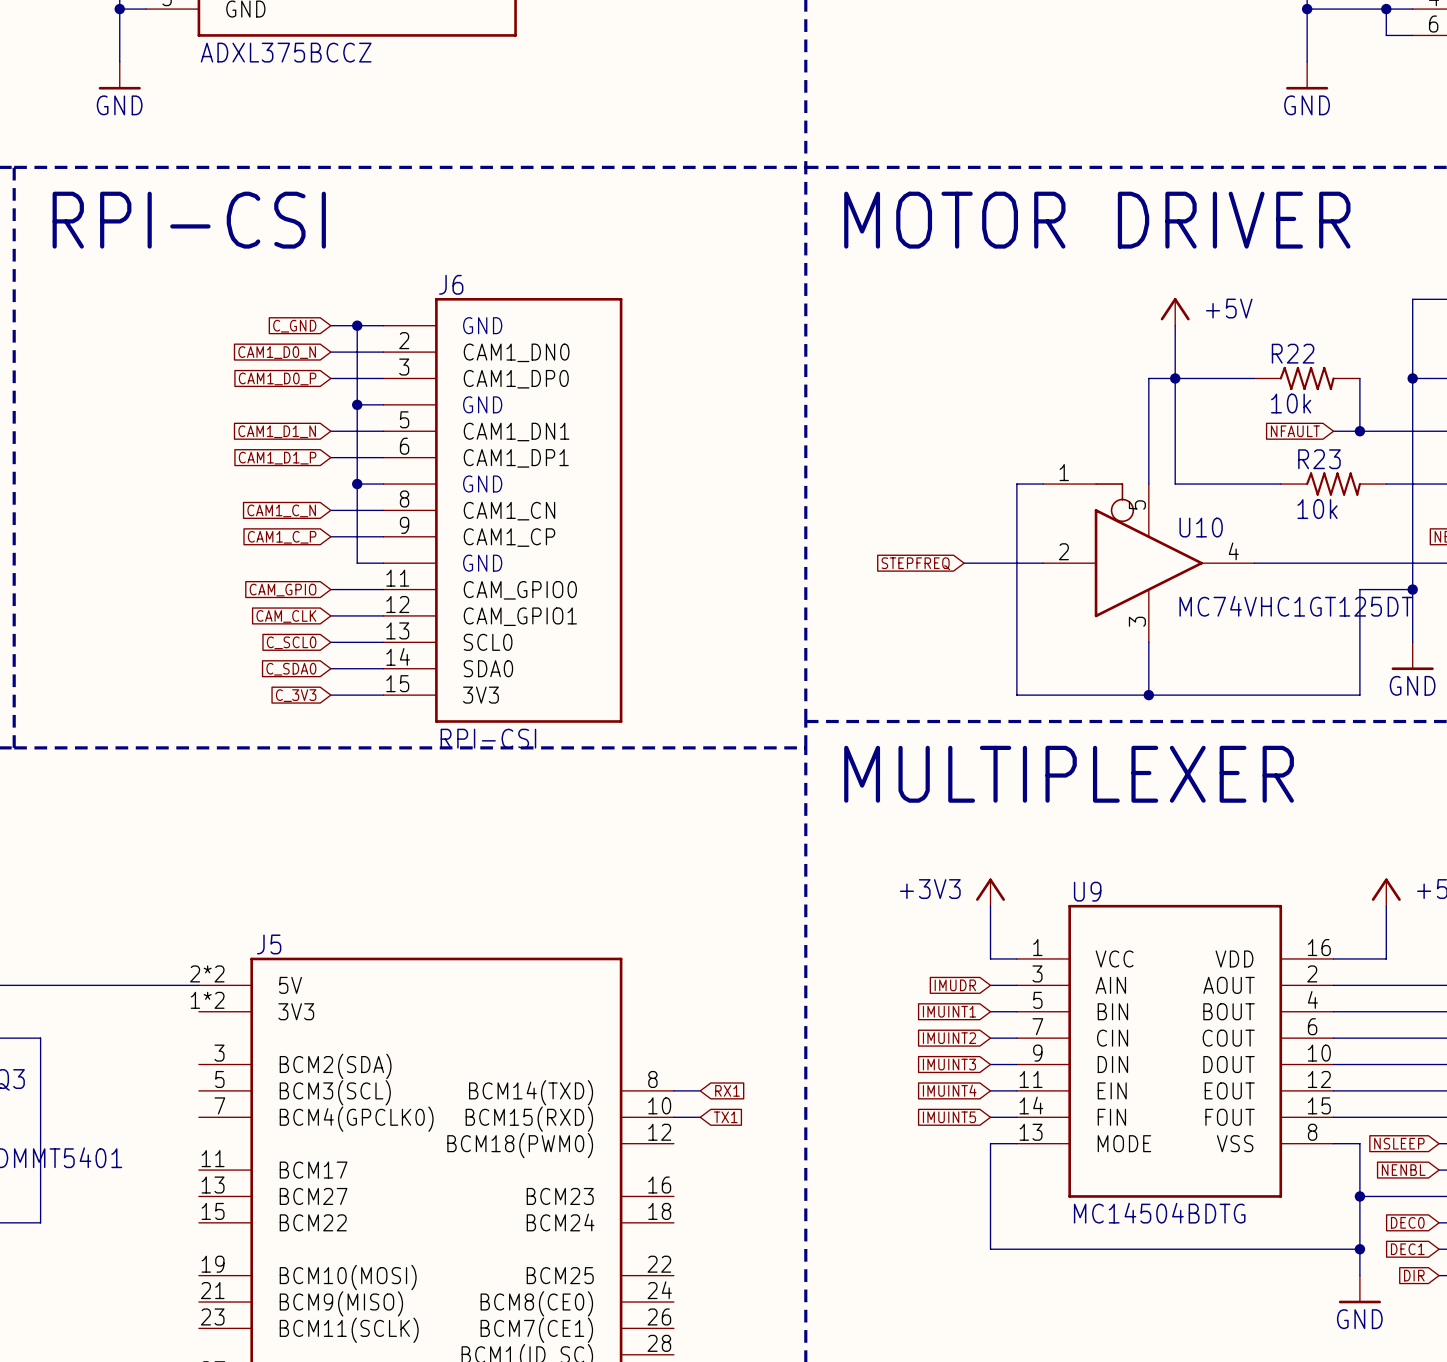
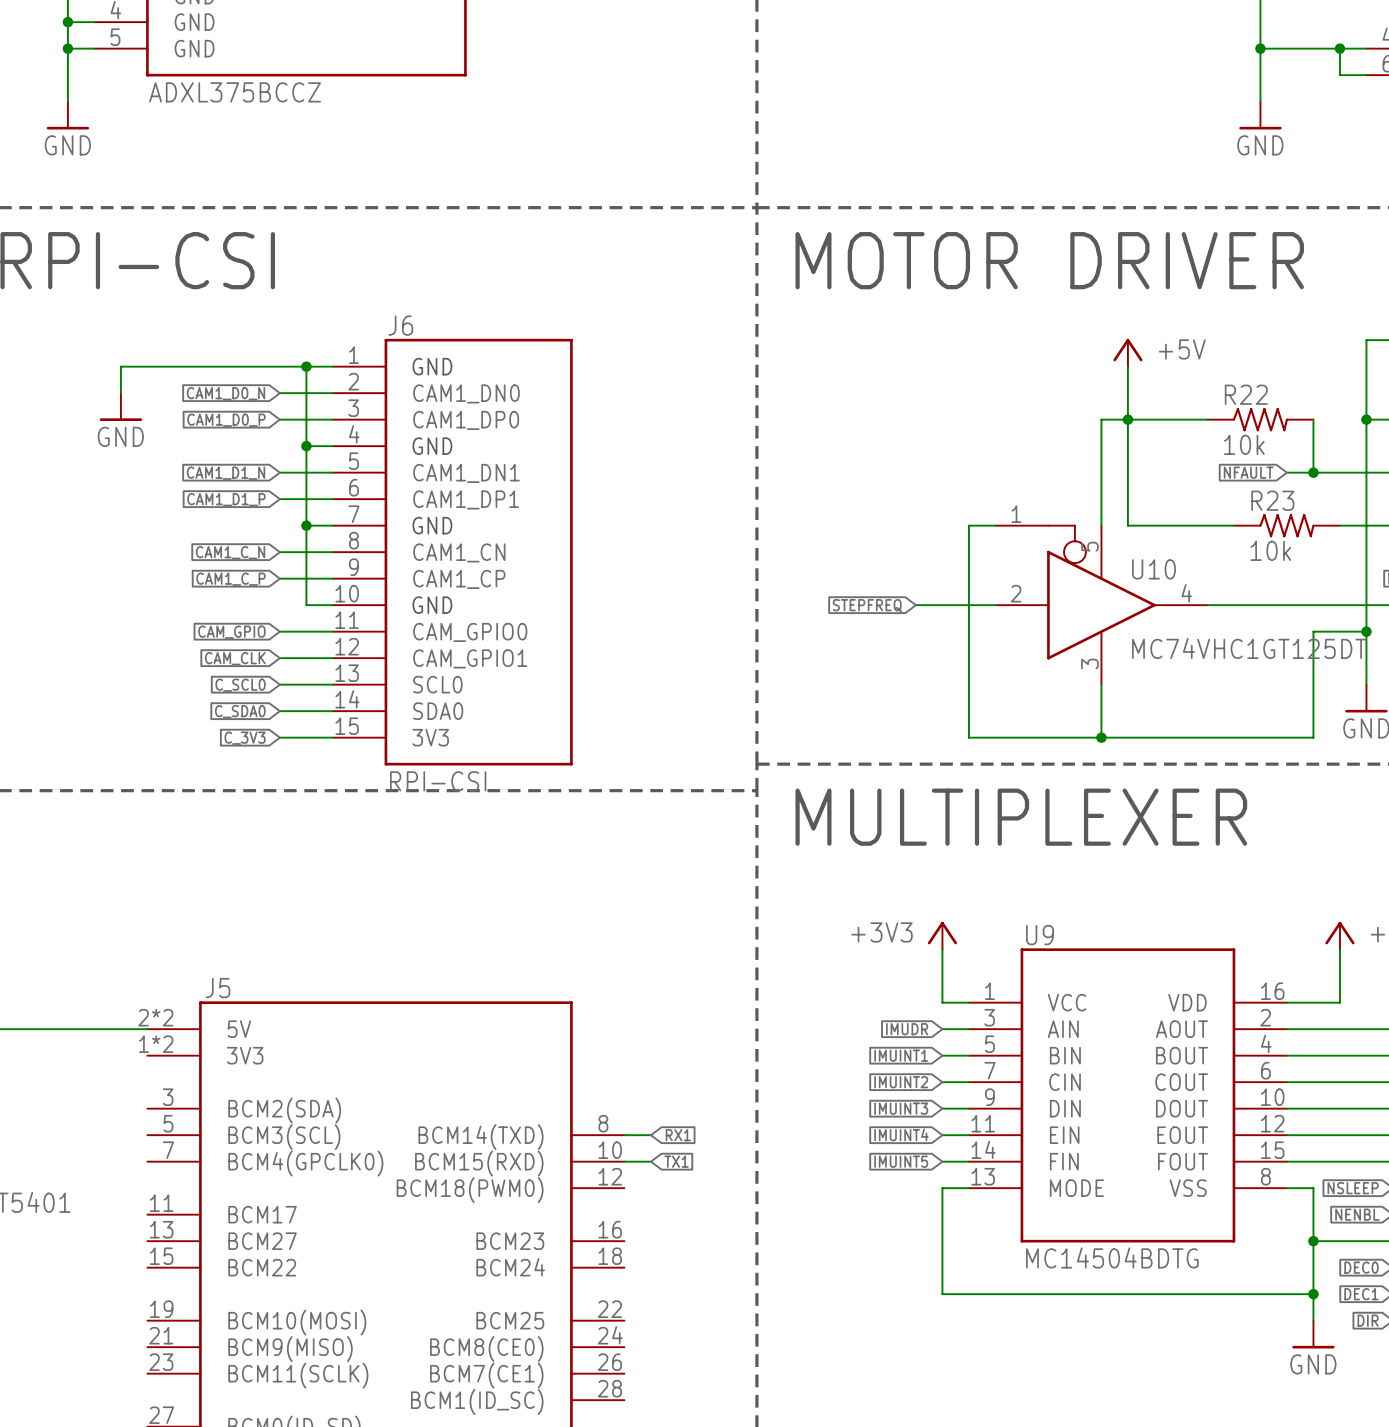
J6 pin number: none -> 1 (353, 355)
wire: none -> (279, 366) (120, 366) (120, 393)
global label: C_GND (294, 326) -> none
power symbol: none -> GND (120, 407)
J6 pin number: none -> 4 (354, 434)
J6 pin number: none -> 7 (353, 514)
J6 pin number: none -> 10 (347, 593)

